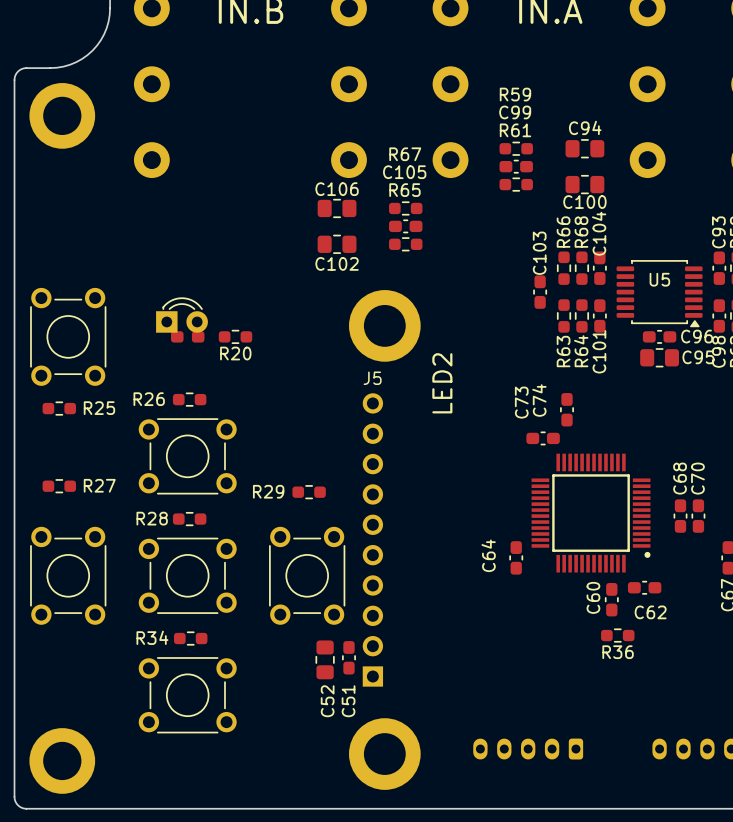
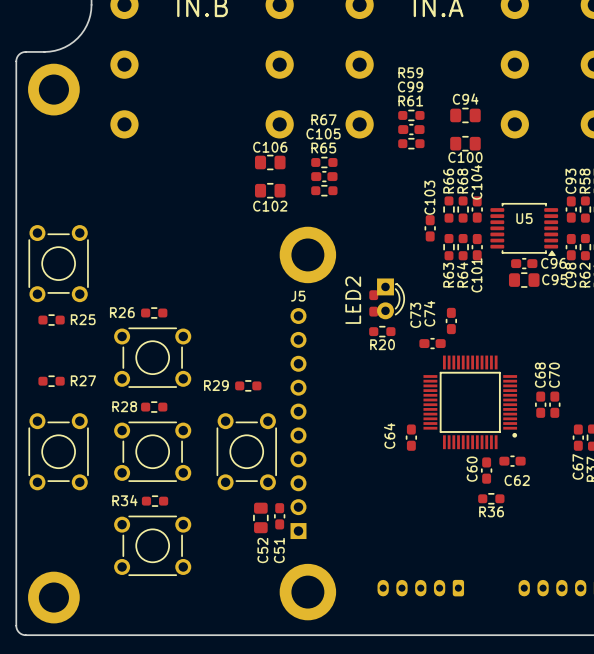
part: (181, 315) -> none
part rotation: 0° (187, 336) -> 90° clockwise (373, 303)
part position: (187, 336) -> (373, 303)
R20 position: (235, 336) -> (382, 331)
part: none -> (390, 298)

